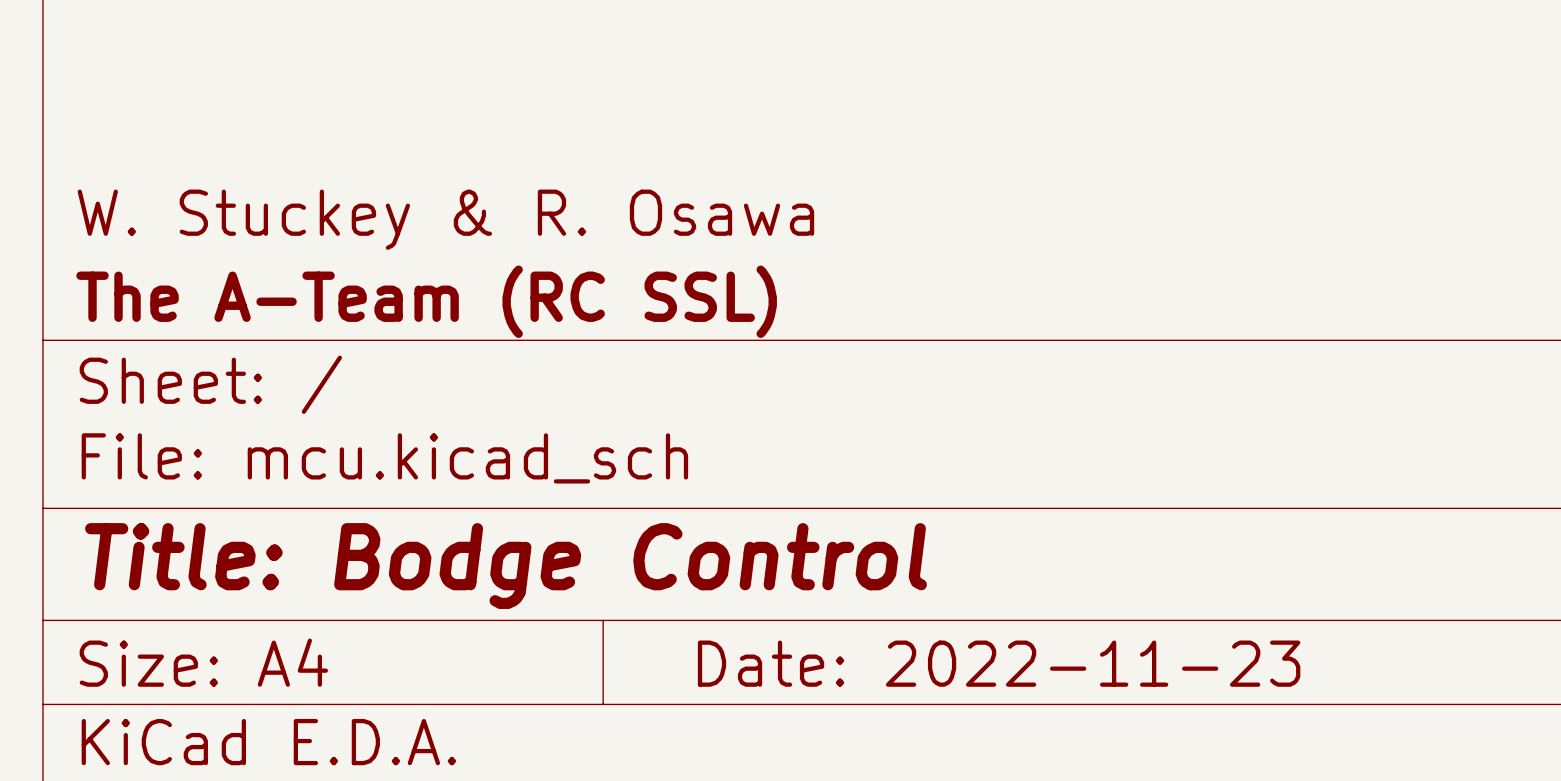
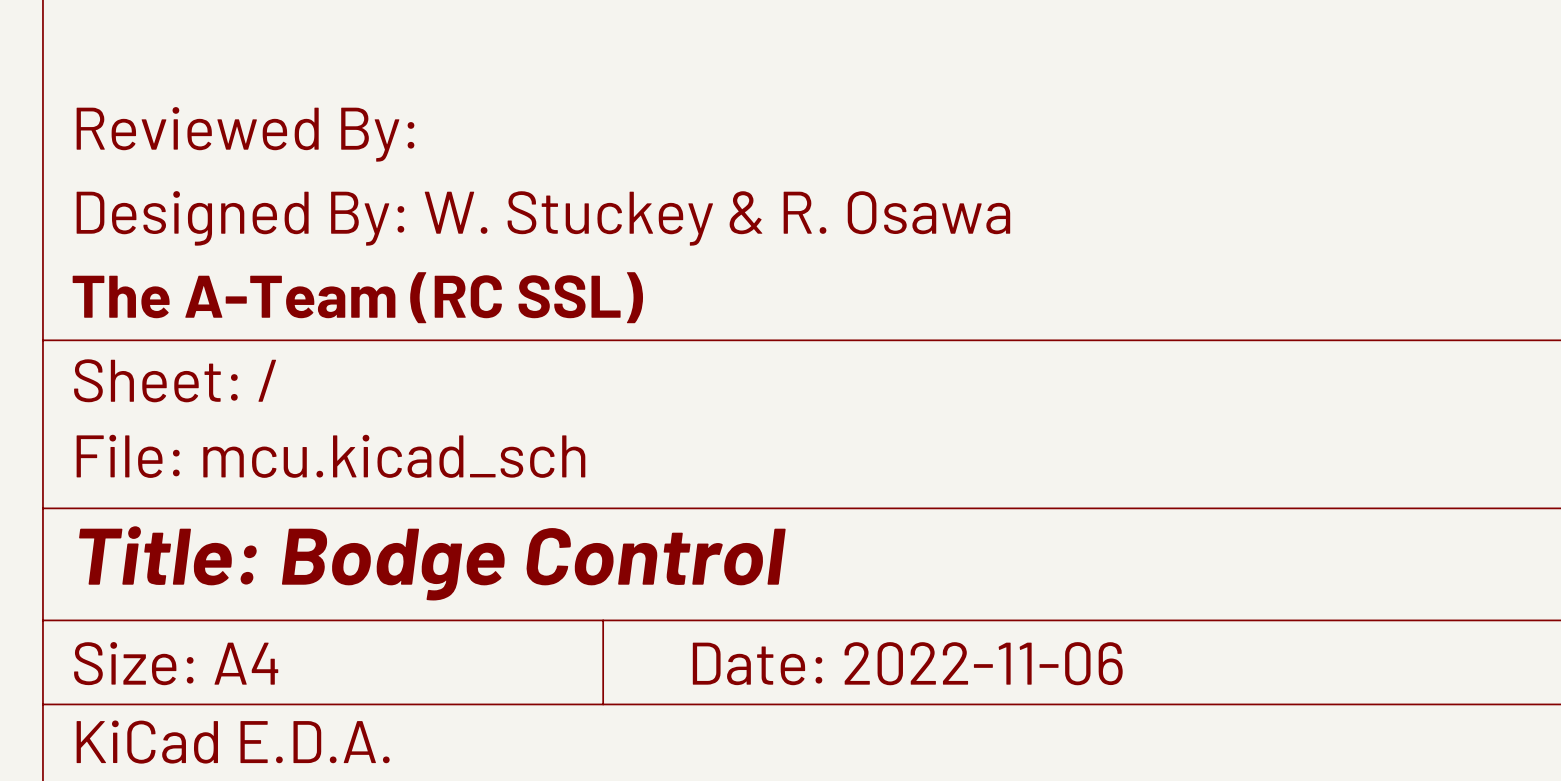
title block: none -> Reviewed By: (245, 134)
title block: W. Stuckey & R. Osawa (445, 219) -> Designed By: W. Stuckey & R. Osawa (543, 218)
title block: Date: 2022-11-23 (999, 663) -> Date: 2022-11-06 (907, 663)

